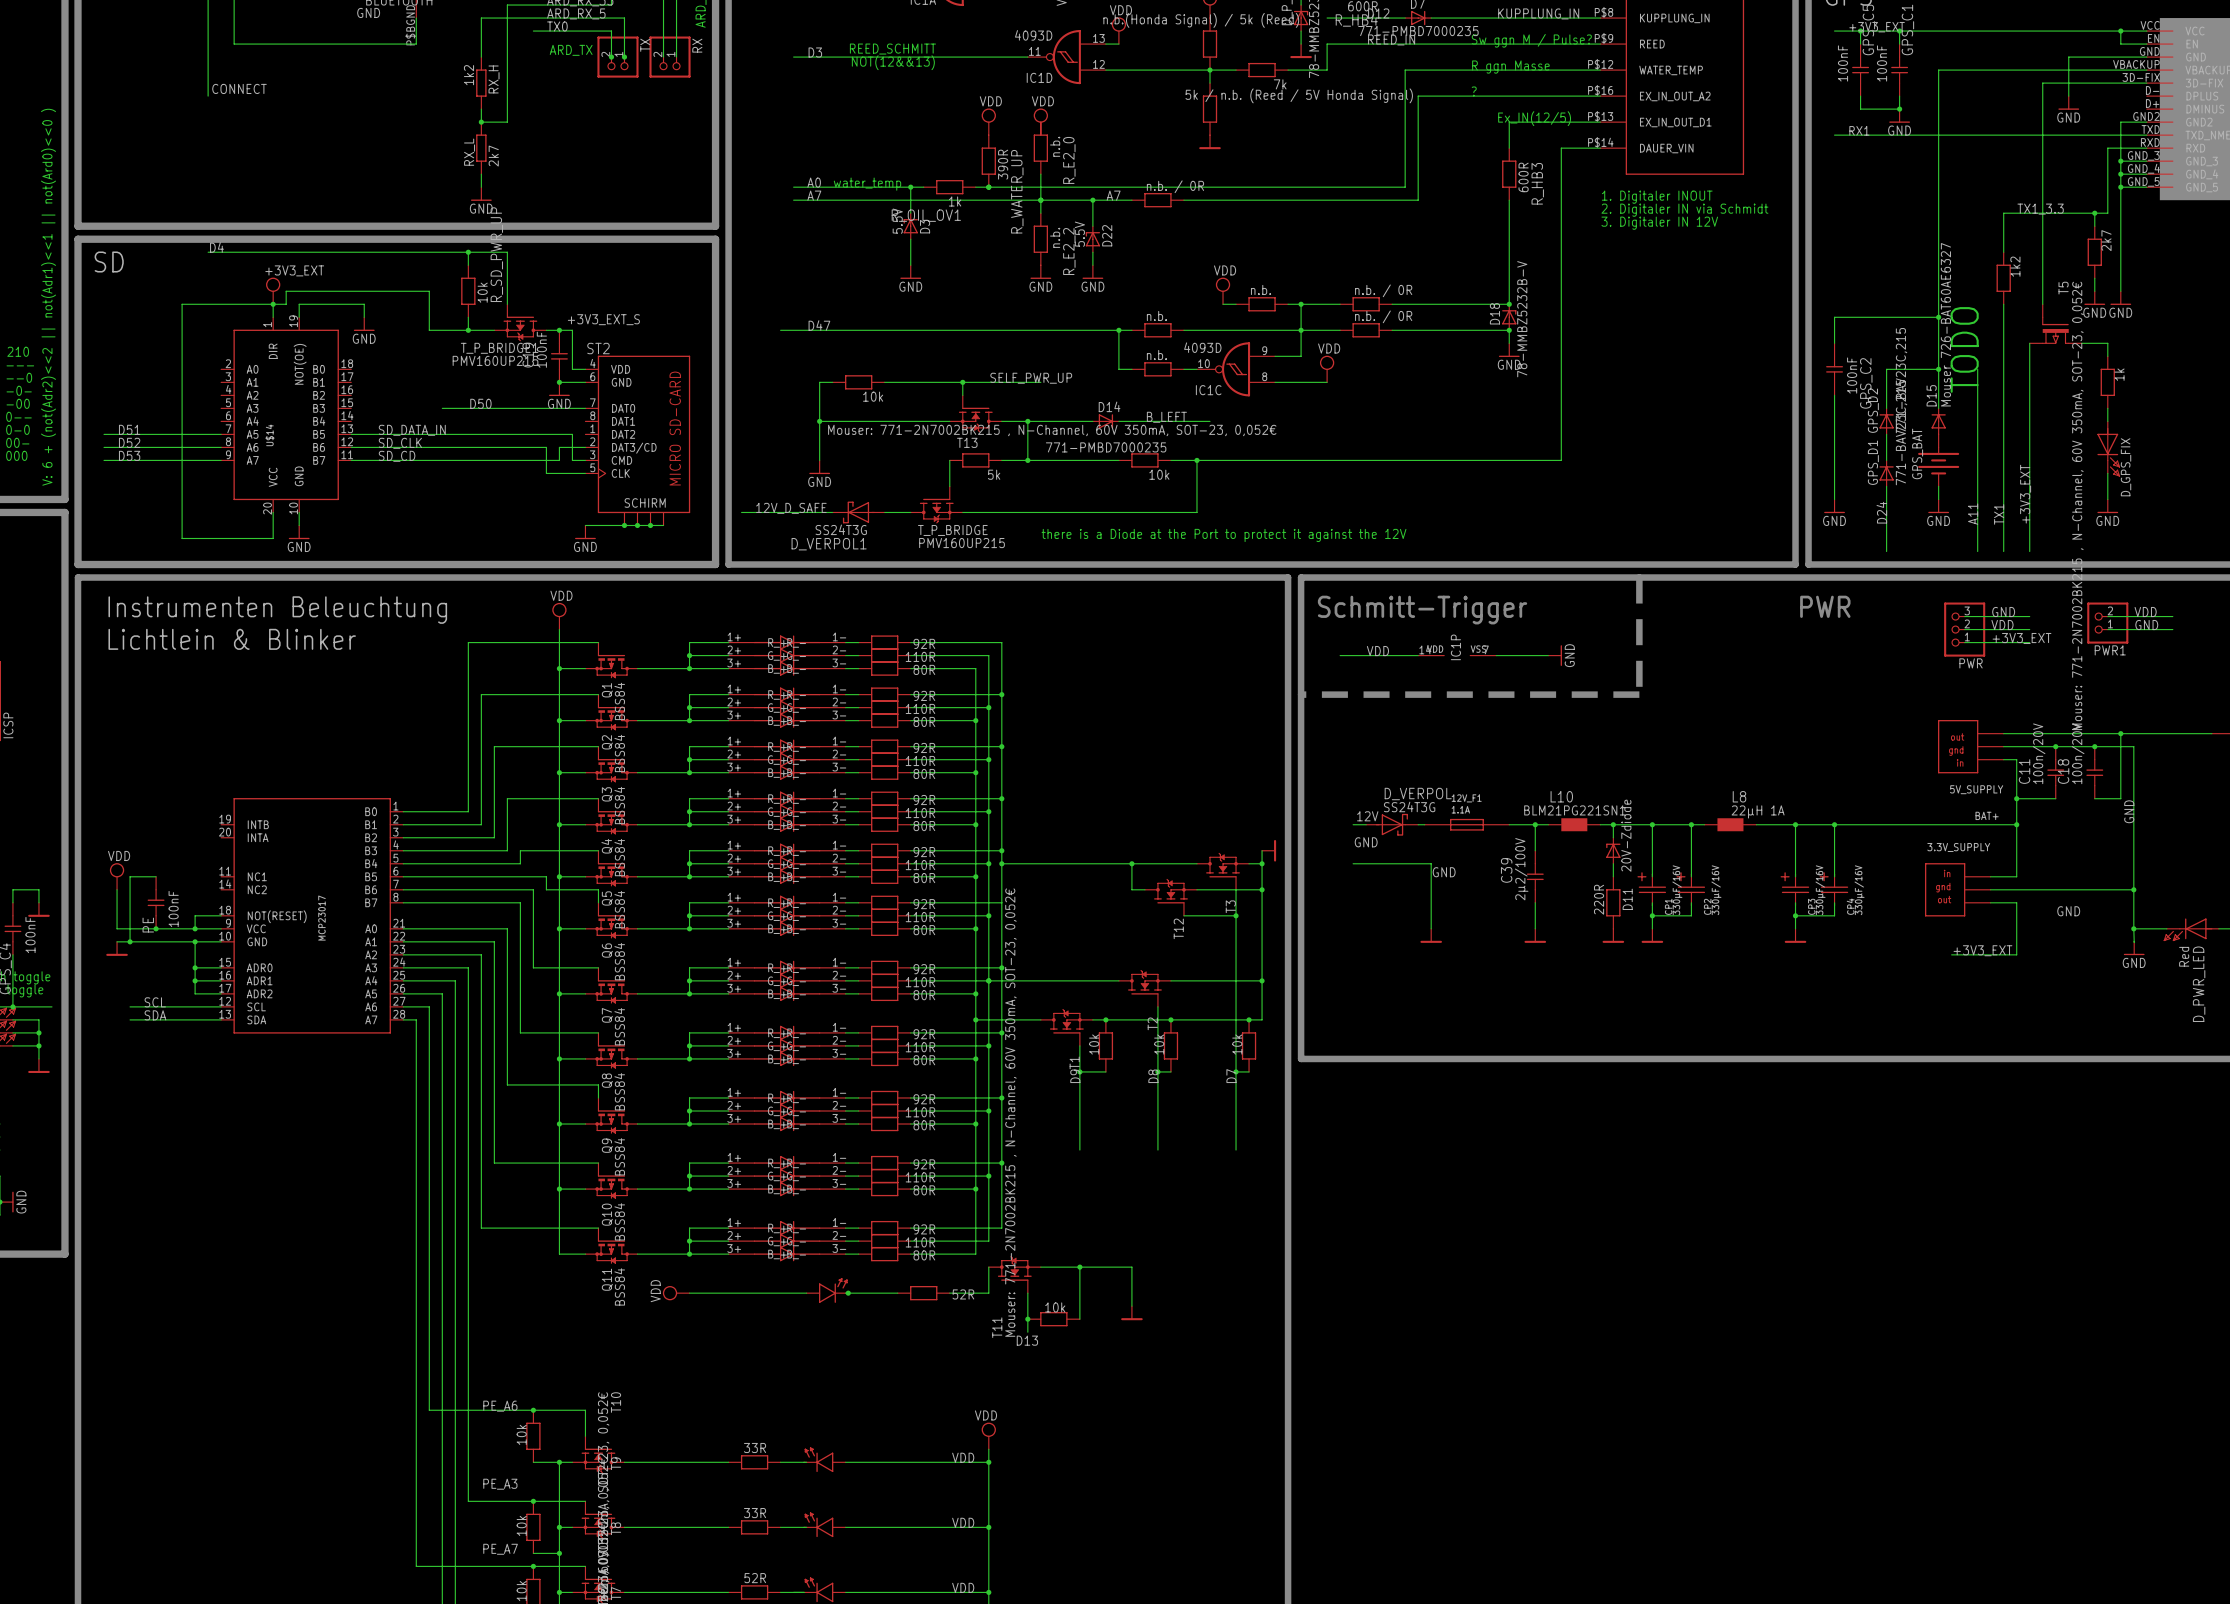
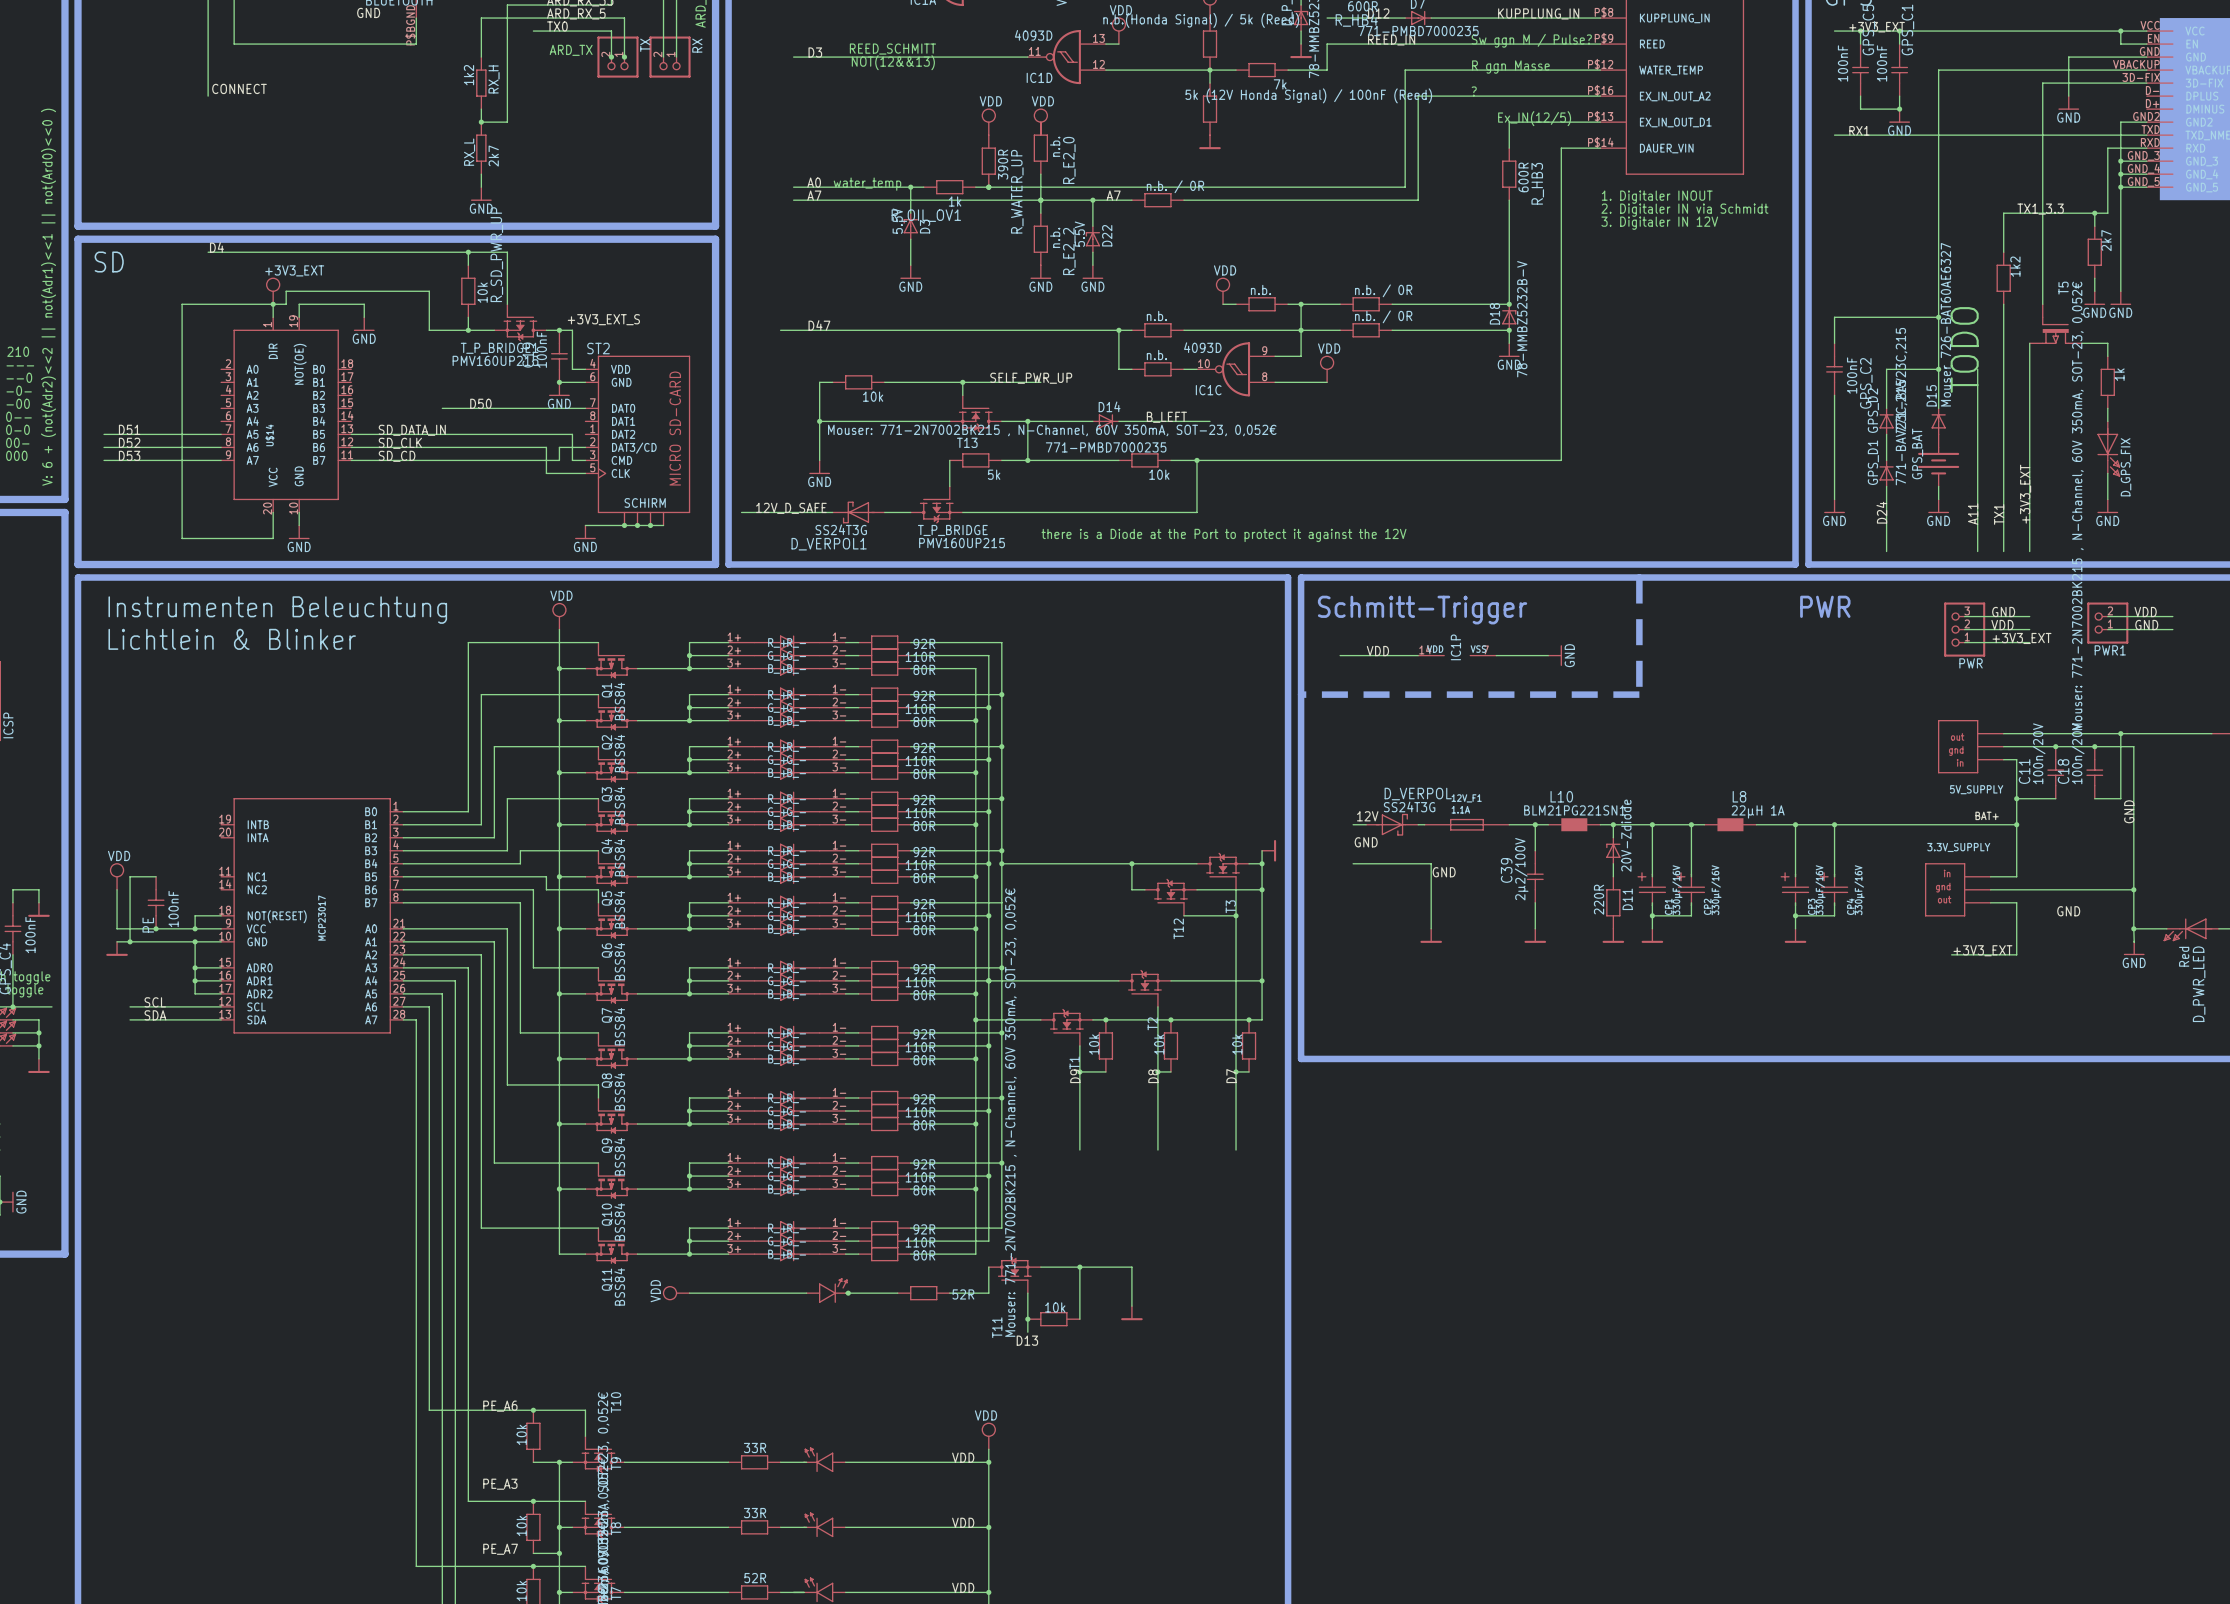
part value: 5k / n.b. (Reed / 5V Honda Signal) (1299, 95) -> 5k (12V Honda Signal) / 100nF (Reed) (1308, 95)

